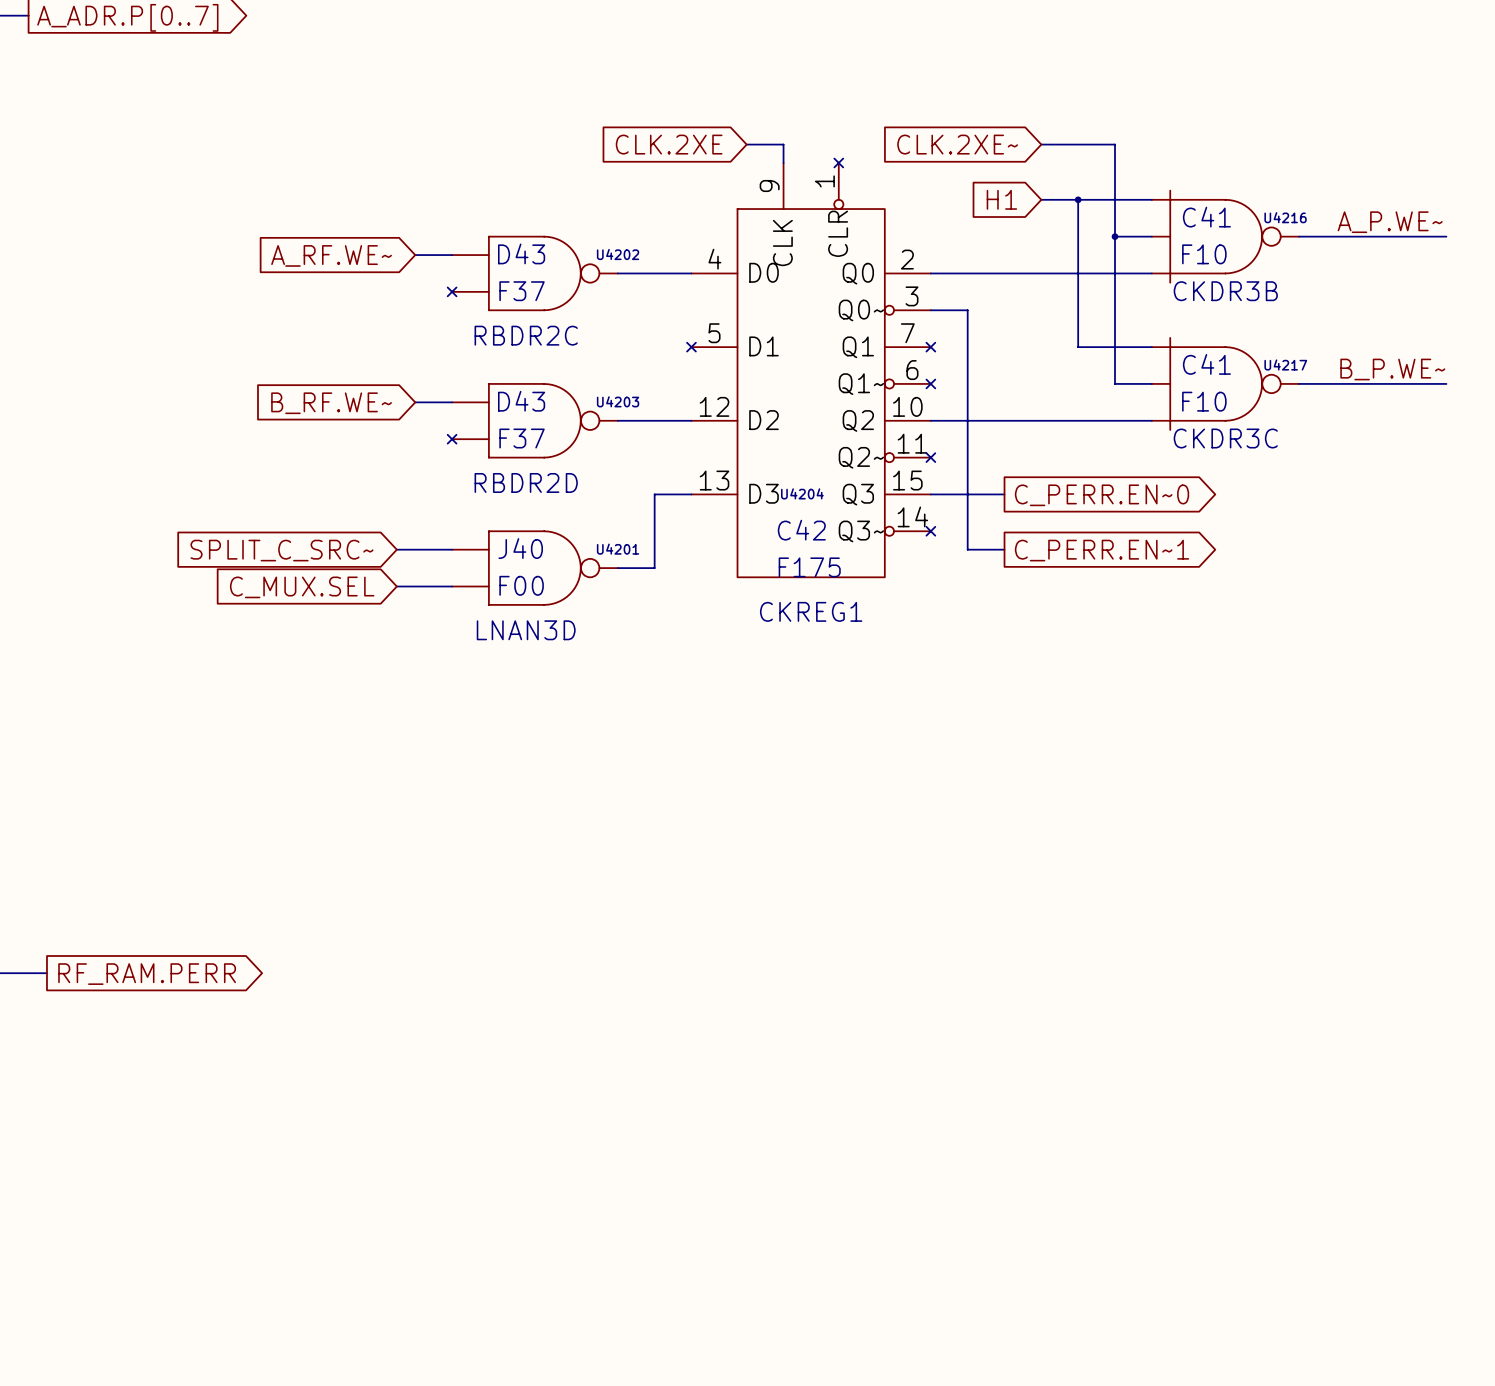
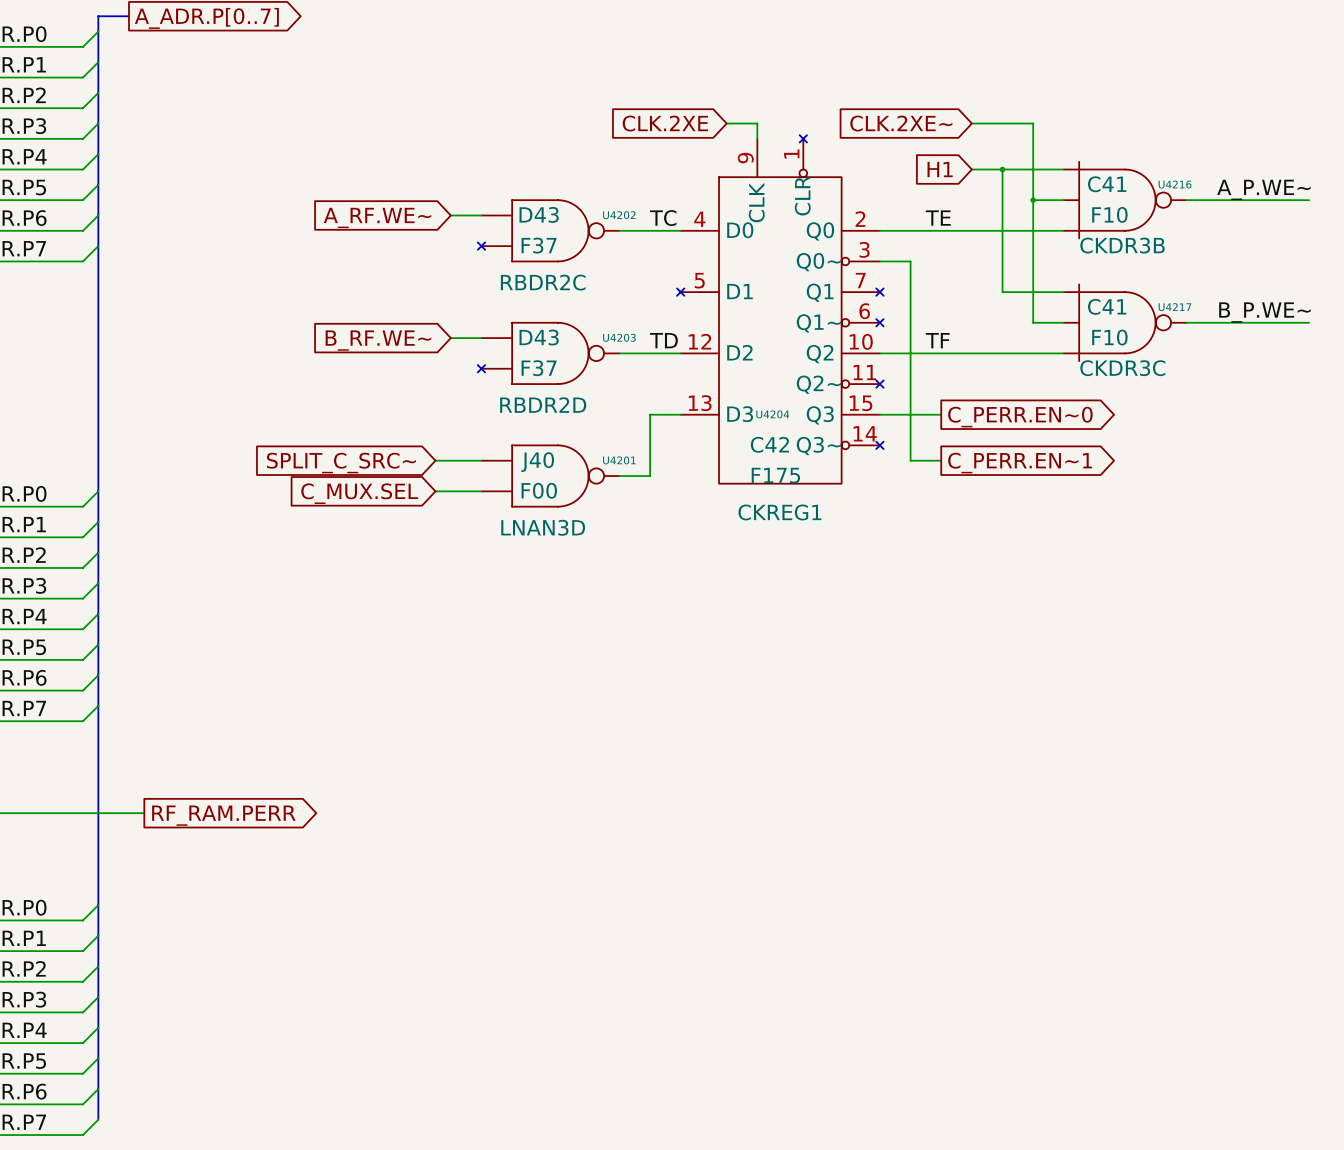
label: none -> TC (663, 218)
label: none -> TE (938, 218)
label: none -> TD (663, 340)
label: none -> TF (937, 340)

